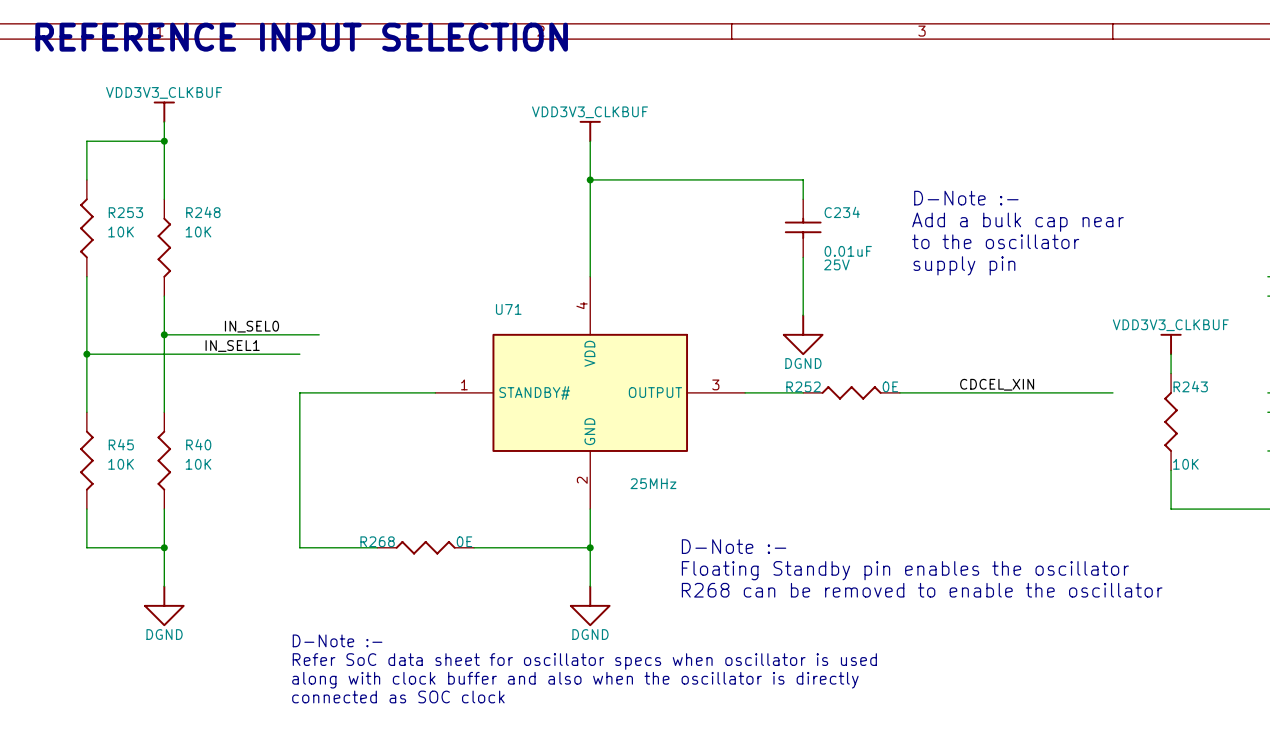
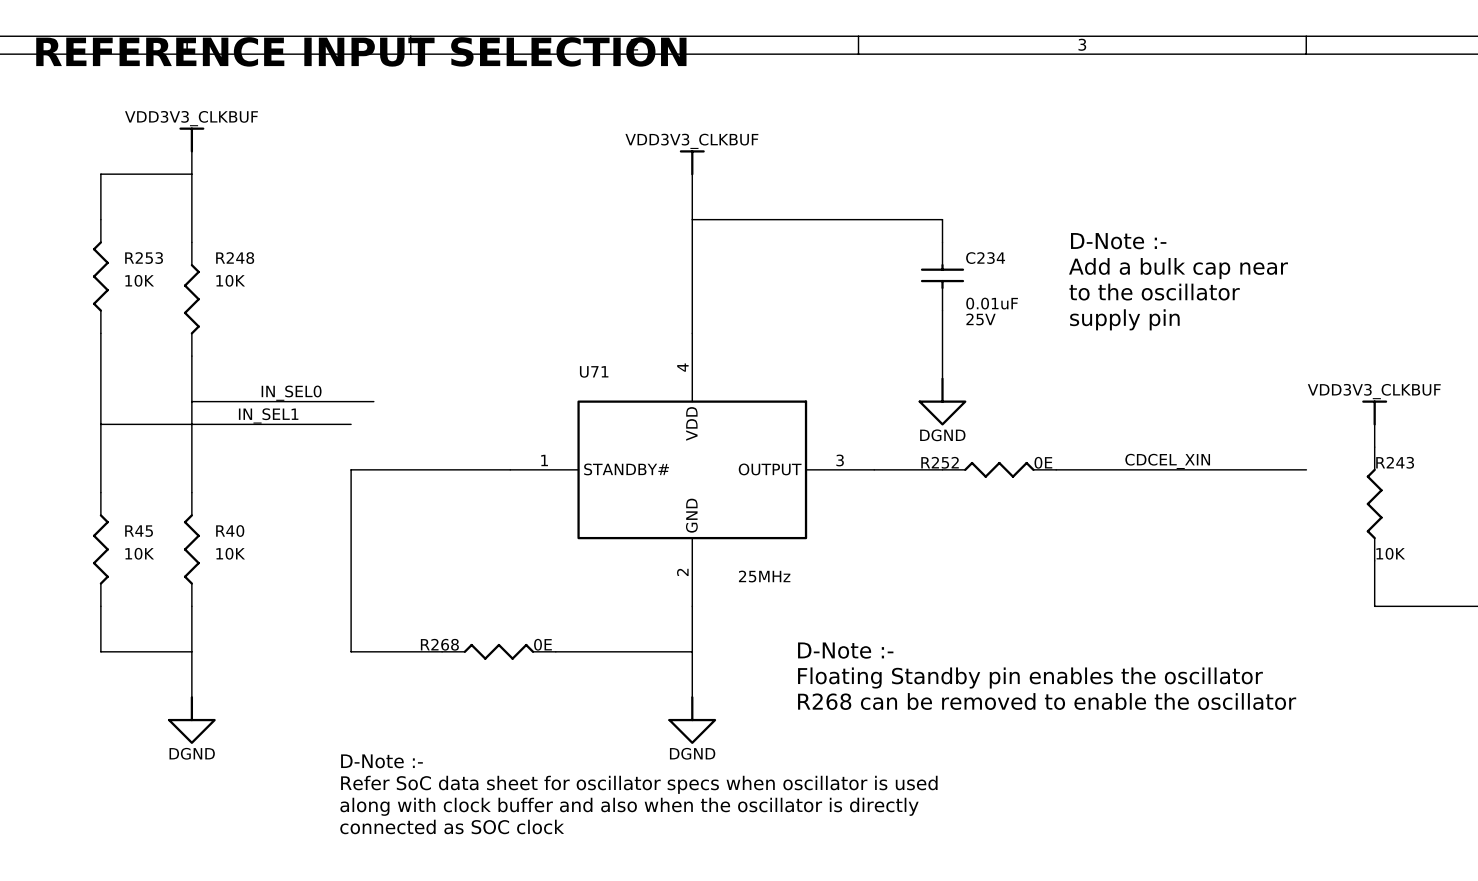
junction: (164, 141) -> none
junction: (590, 179) -> none
junction: (164, 334) -> none
junction: (86, 354) -> none
junction: (164, 547) -> none
junction: (590, 547) -> none

